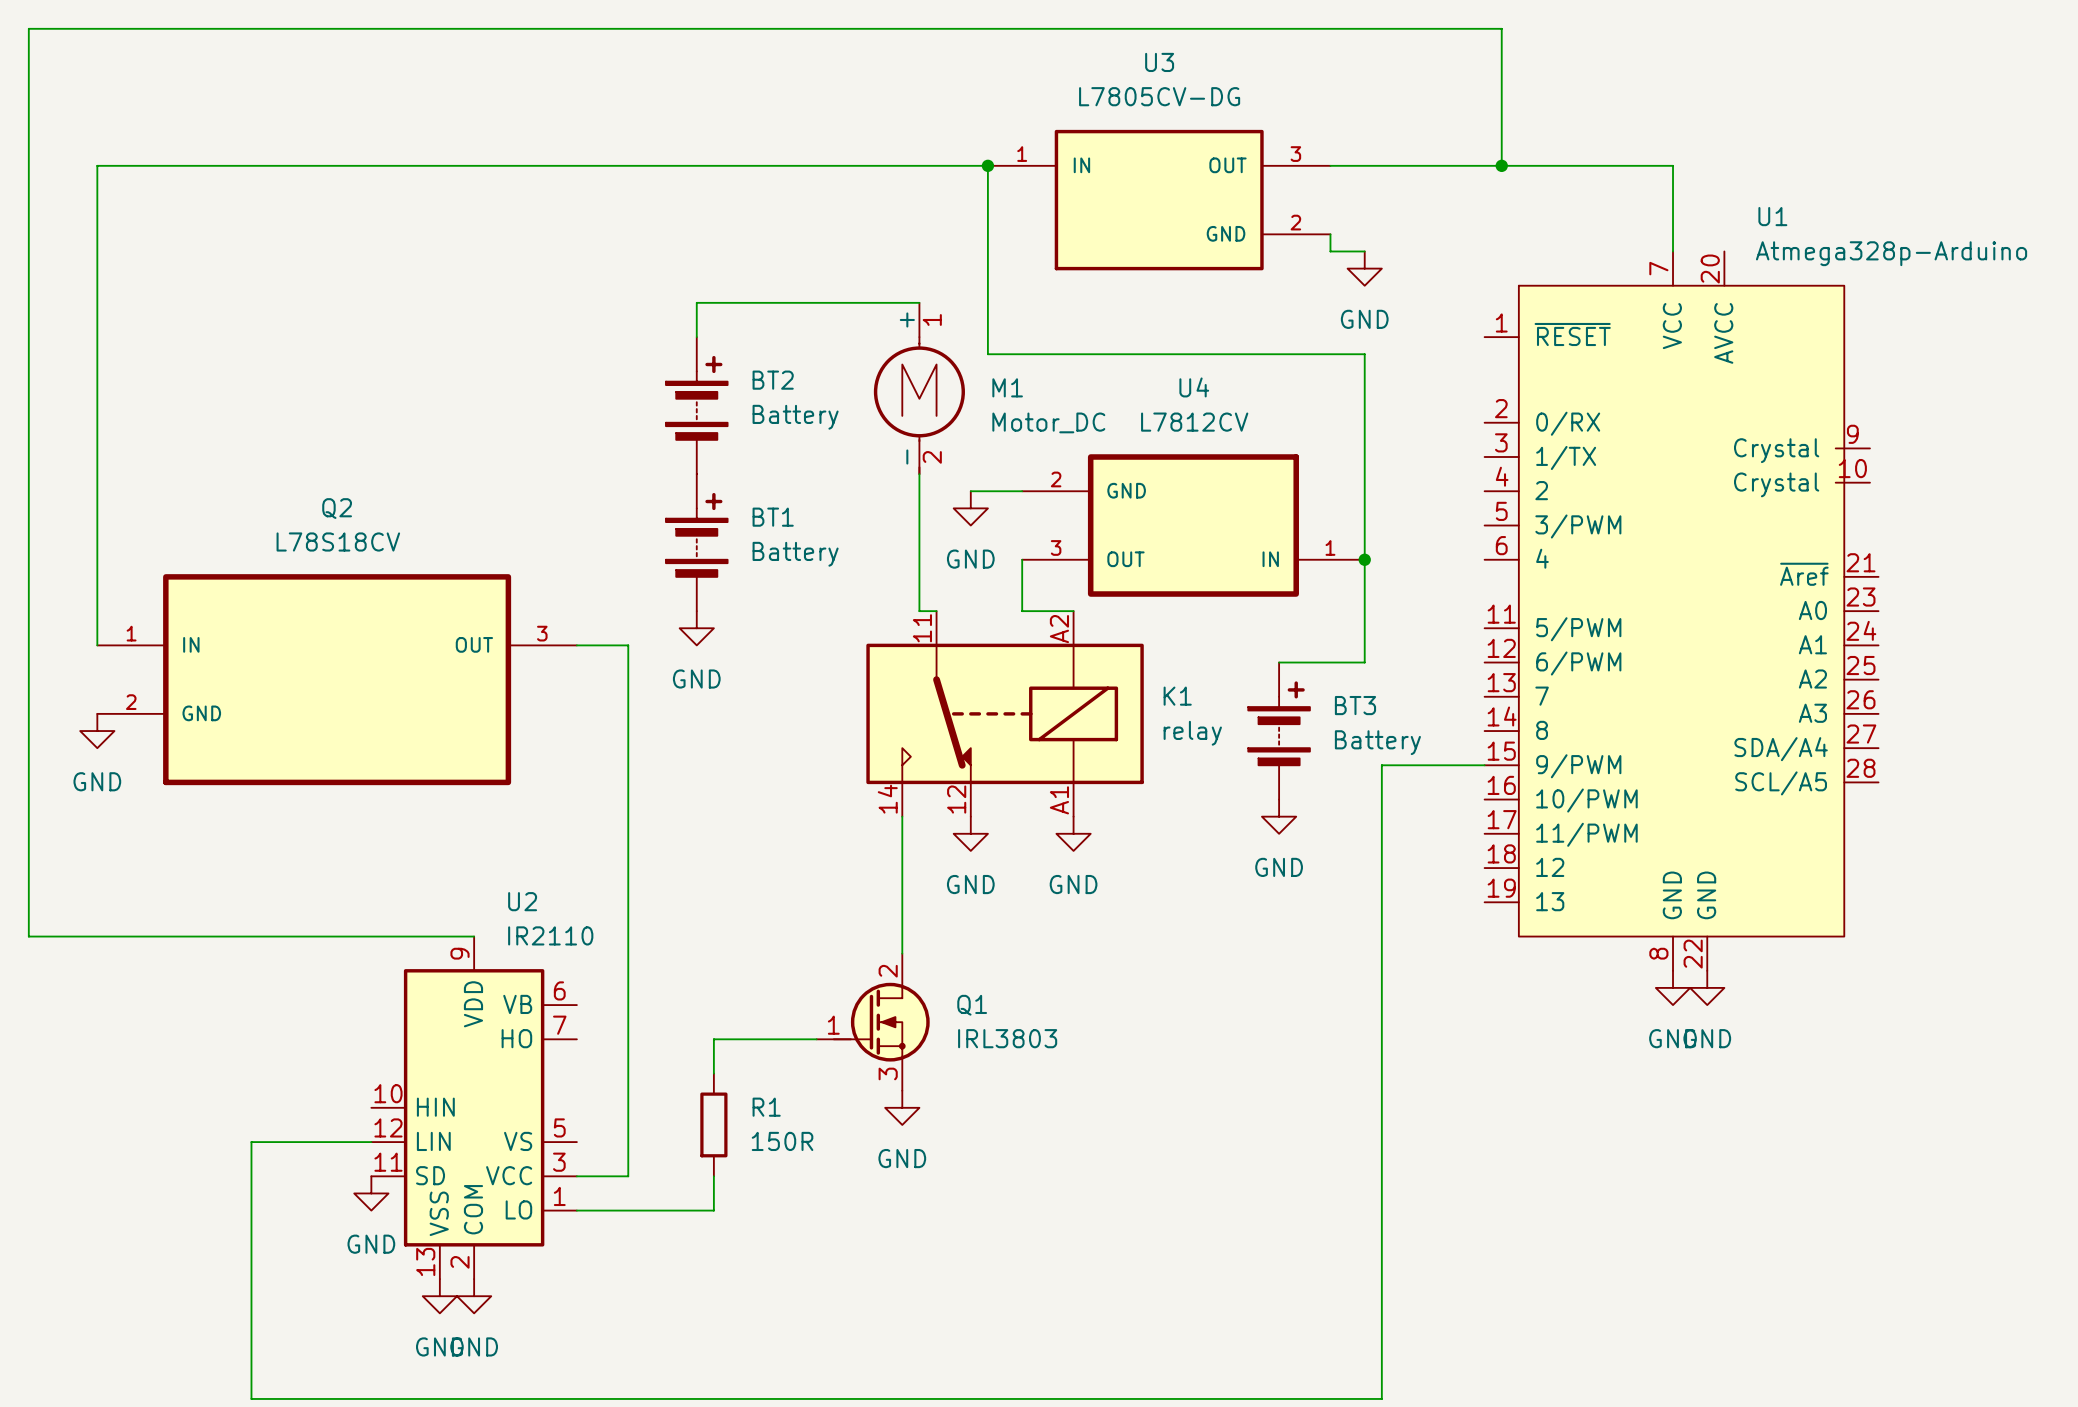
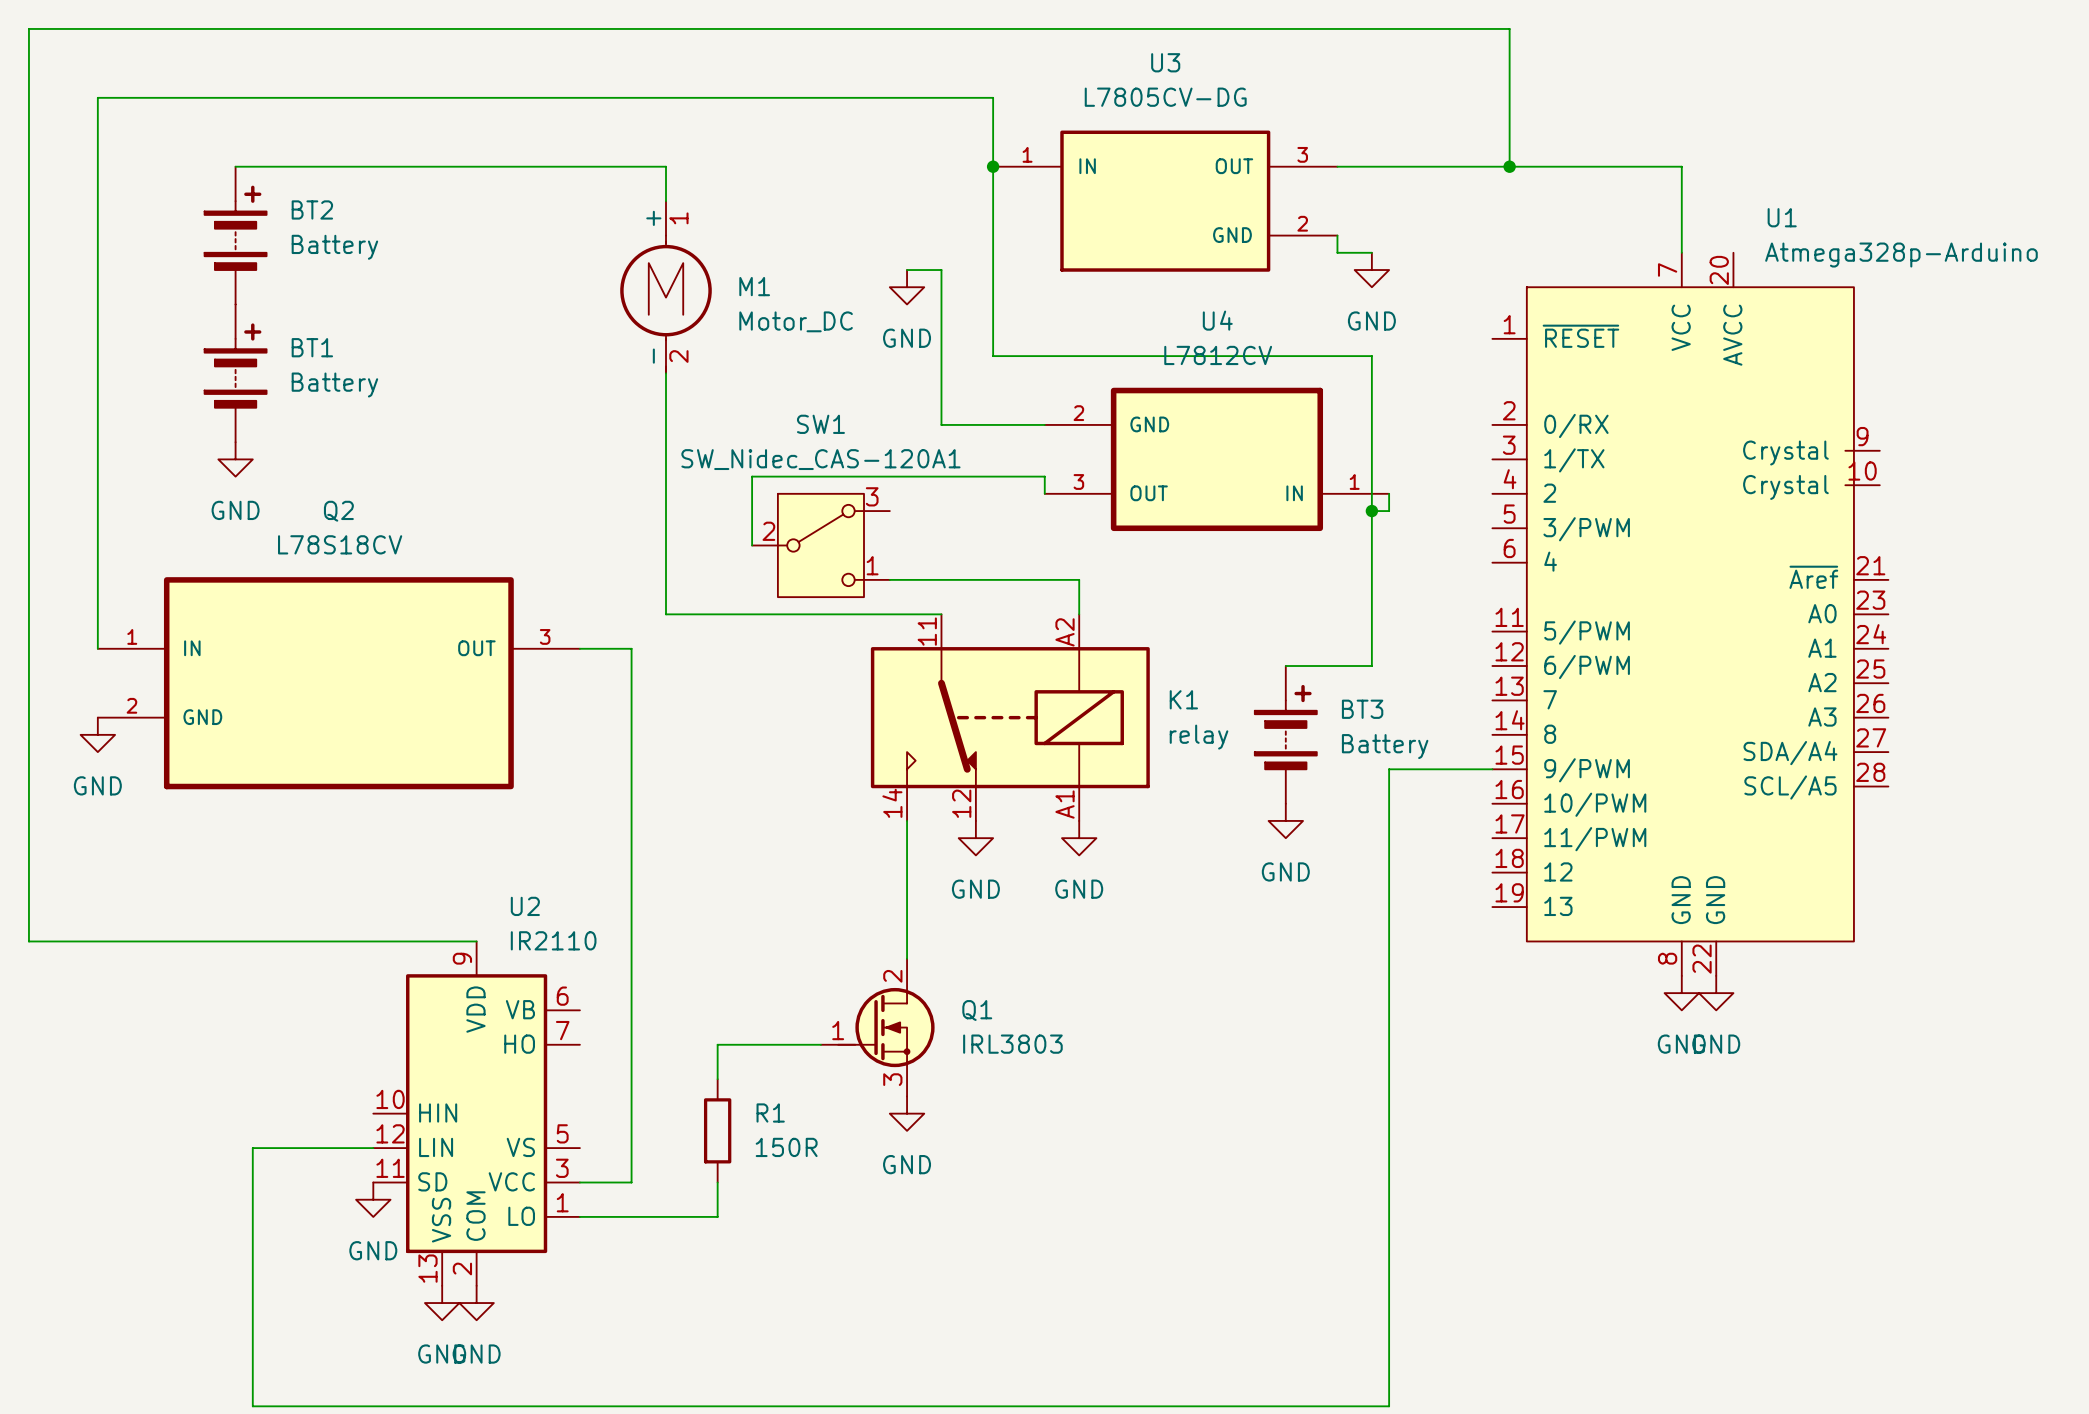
wire: (97, 165) (234, 165) -> (97, 166) (97, 97) (993, 97) (993, 166)
wire: (662, 165) (987, 165) -> (666, 166) (666, 201)
wire: none -> (907, 270) (941, 270) (941, 424) (1044, 424)
power symbol: none -> GND (907, 287)
wire: (919, 302) (696, 302) (696, 337) -> none
M1 position: (919, 388) -> (666, 287)
BT2 position: (696, 405) -> (235, 235)
power symbol: none -> GND (235, 459)
wire: (919, 474) (919, 611) -> (666, 373) (666, 614) (924, 614)
wire: (970, 491) (1022, 491) -> none
wire: none -> (1044, 493) (1044, 476) (752, 476) (752, 545)
wire: none -> (1389, 493) (1389, 511) (1371, 511)
power symbol: GND (970, 508) -> none
U4 position: (1193, 525) -> (1216, 459)
BT1 position: (696, 542) -> (235, 373)
SW1: none -> SW_Nidec_CAS-120A1 (820, 545)
wire: (1022, 559) (1022, 611) (1073, 611) -> (889, 579) (1079, 579) (1079, 614)
junction position: (1364, 559) -> (1371, 511)
power symbol: GND (696, 628) -> none

